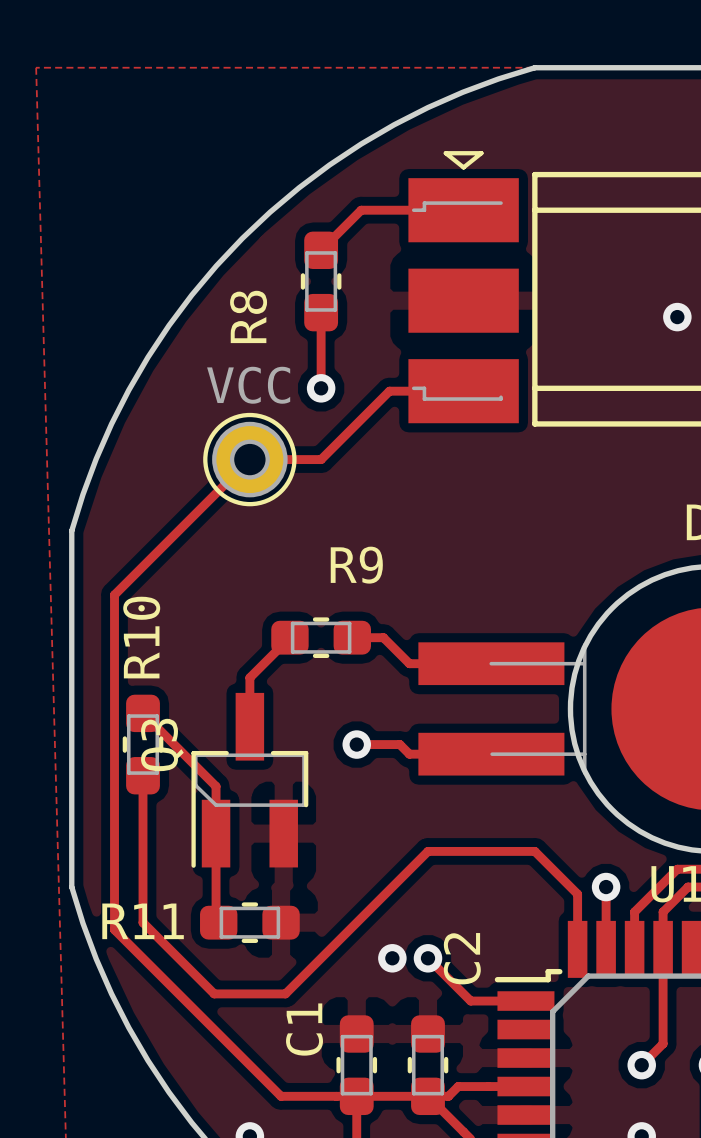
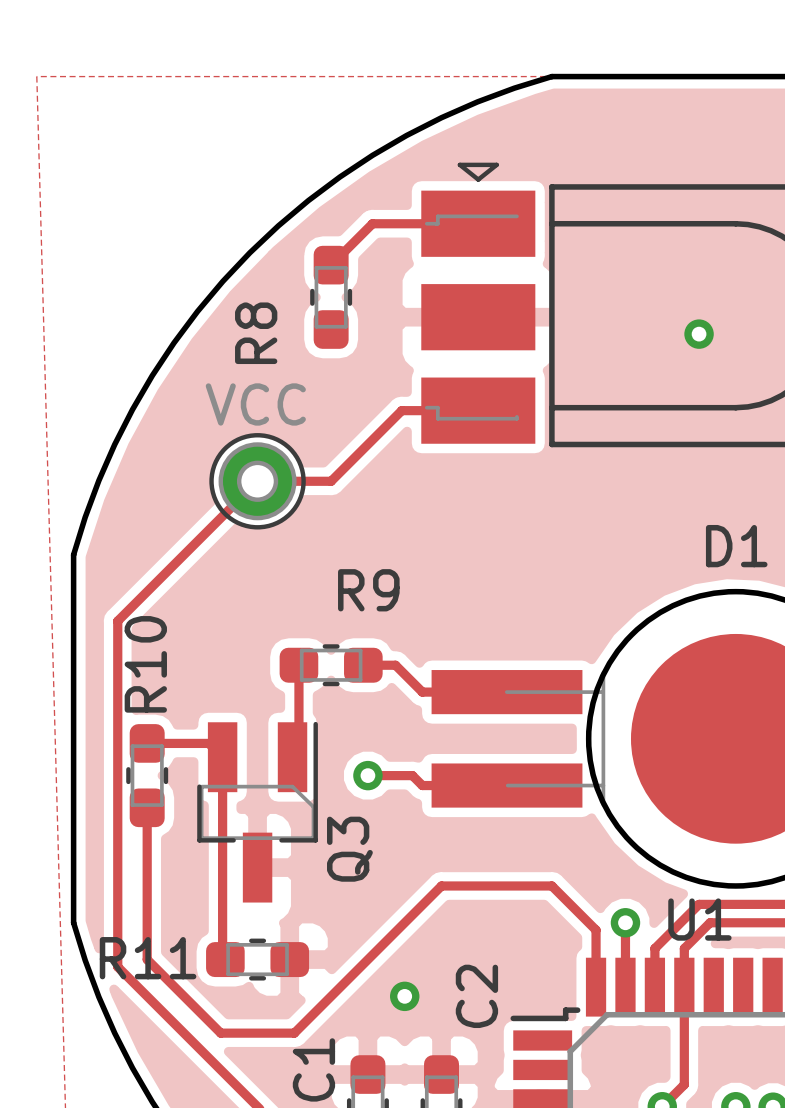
track: (321, 312) (321, 388) -> none
via: (321, 388) -> none
track: (289, 637) (249, 677) (249, 726) -> (298, 665) (298, 750) (292, 757)
track: (143, 713) (216, 786) -> (147, 743) (208, 743) (222, 757) (222, 818)
Q3 rotation: 0° (249, 780) -> 180° (257, 812)
track: (427, 958) (470, 1001) (525, 1001) -> none
via: (427, 958) -> none

